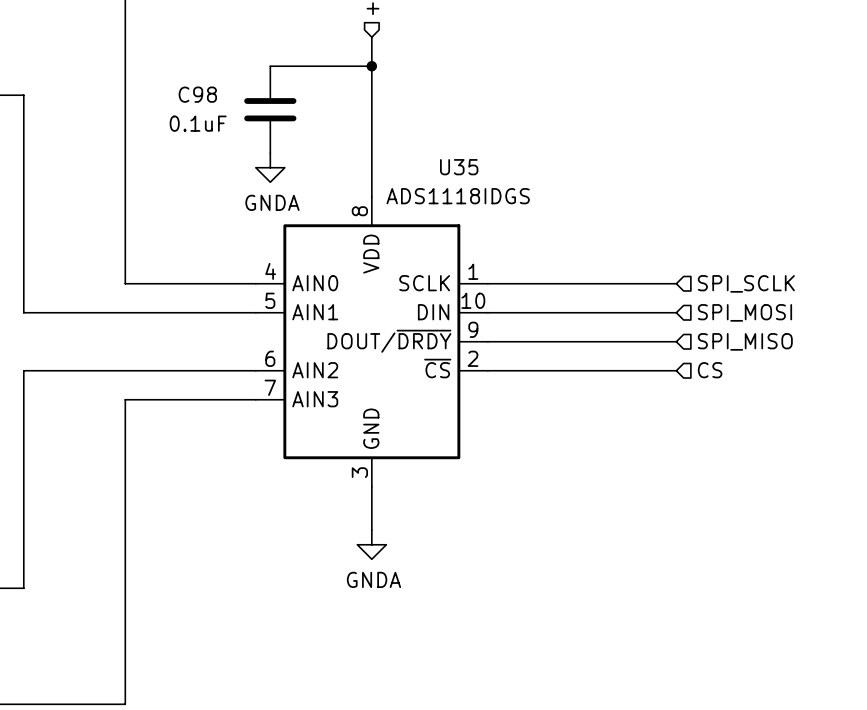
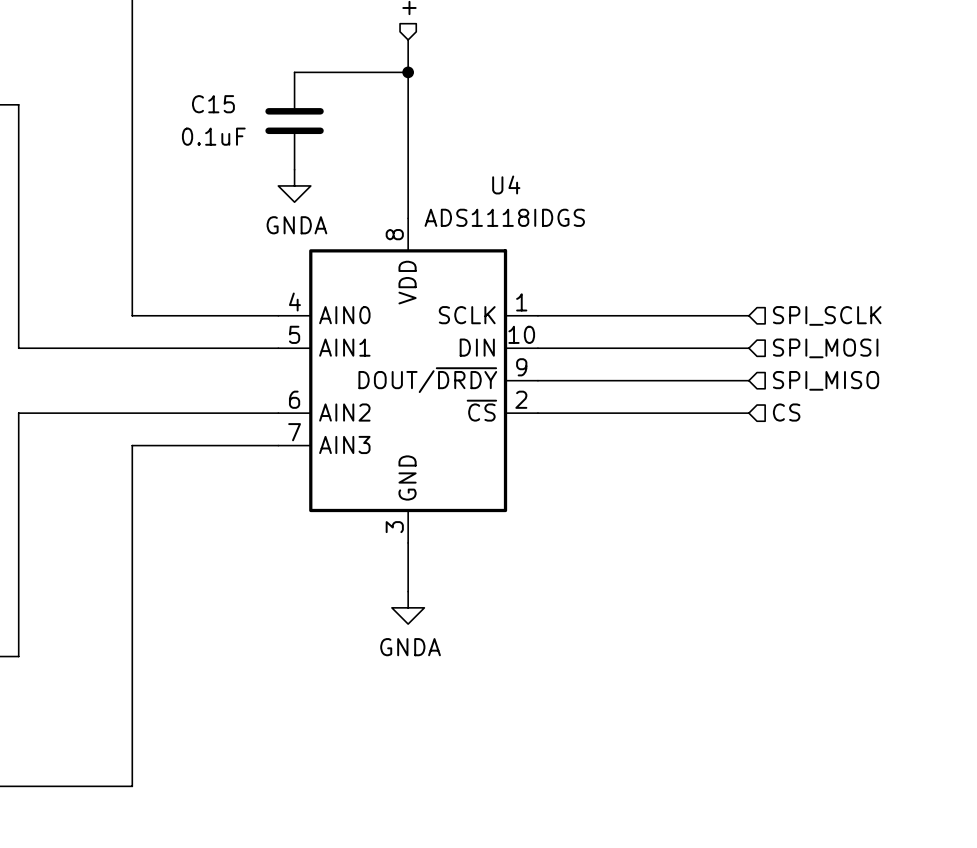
C98 name: C98 (197, 94) -> C15 (213, 104)
U35 name: U35 (459, 167) -> U4 (506, 184)

